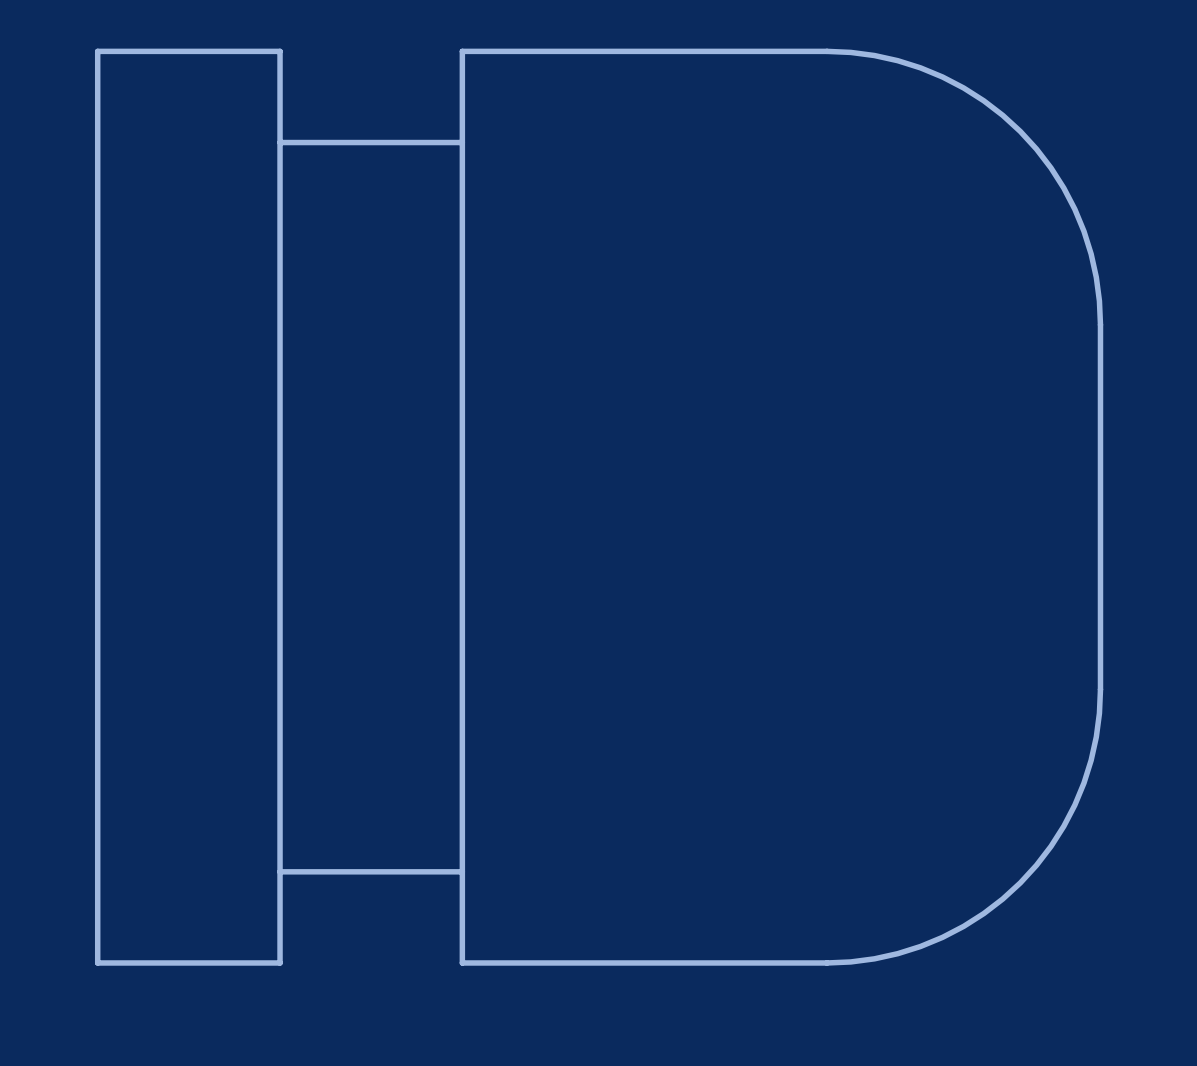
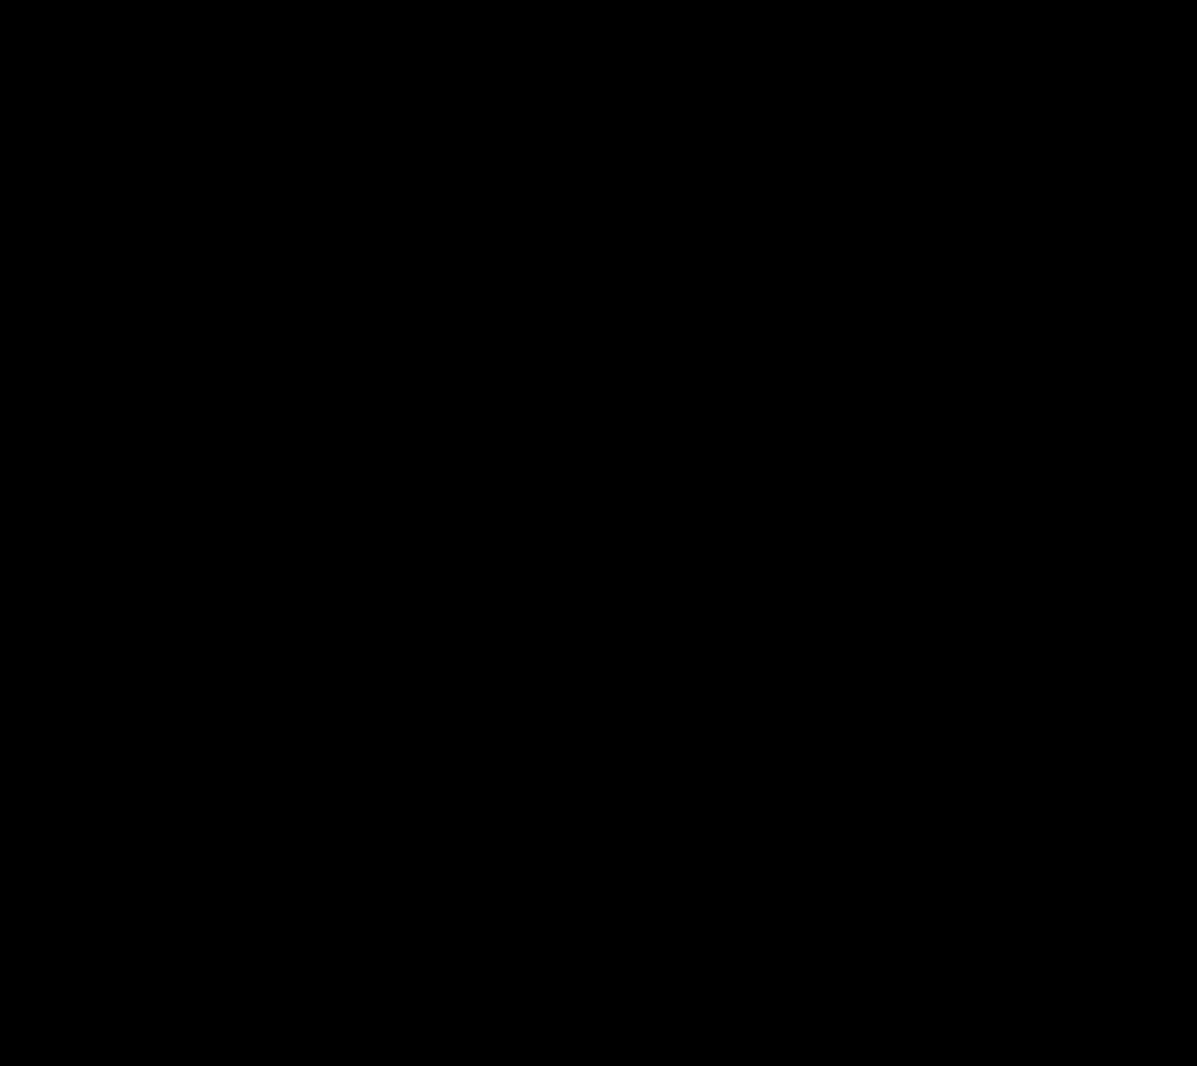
line: (97, 51) (280, 51) (280, 962) (97, 962) (97, 51) -> none
line: (462, 51) (462, 962) (850, 961) (897, 953) (942, 937) (963, 926) (1002, 899) (1036, 865) (1051, 846) (1074, 805) (1091, 760) (1096, 736) (1100, 689) (1099, 301) (1091, 254) (1074, 209) (1063, 188) (1036, 149) (1002, 115) (983, 100) (942, 77) (897, 60) (874, 55) (827, 51) (462, 51) -> none
line: (280, 142) (462, 142) -> none
line: (280, 871) (462, 871) -> none

